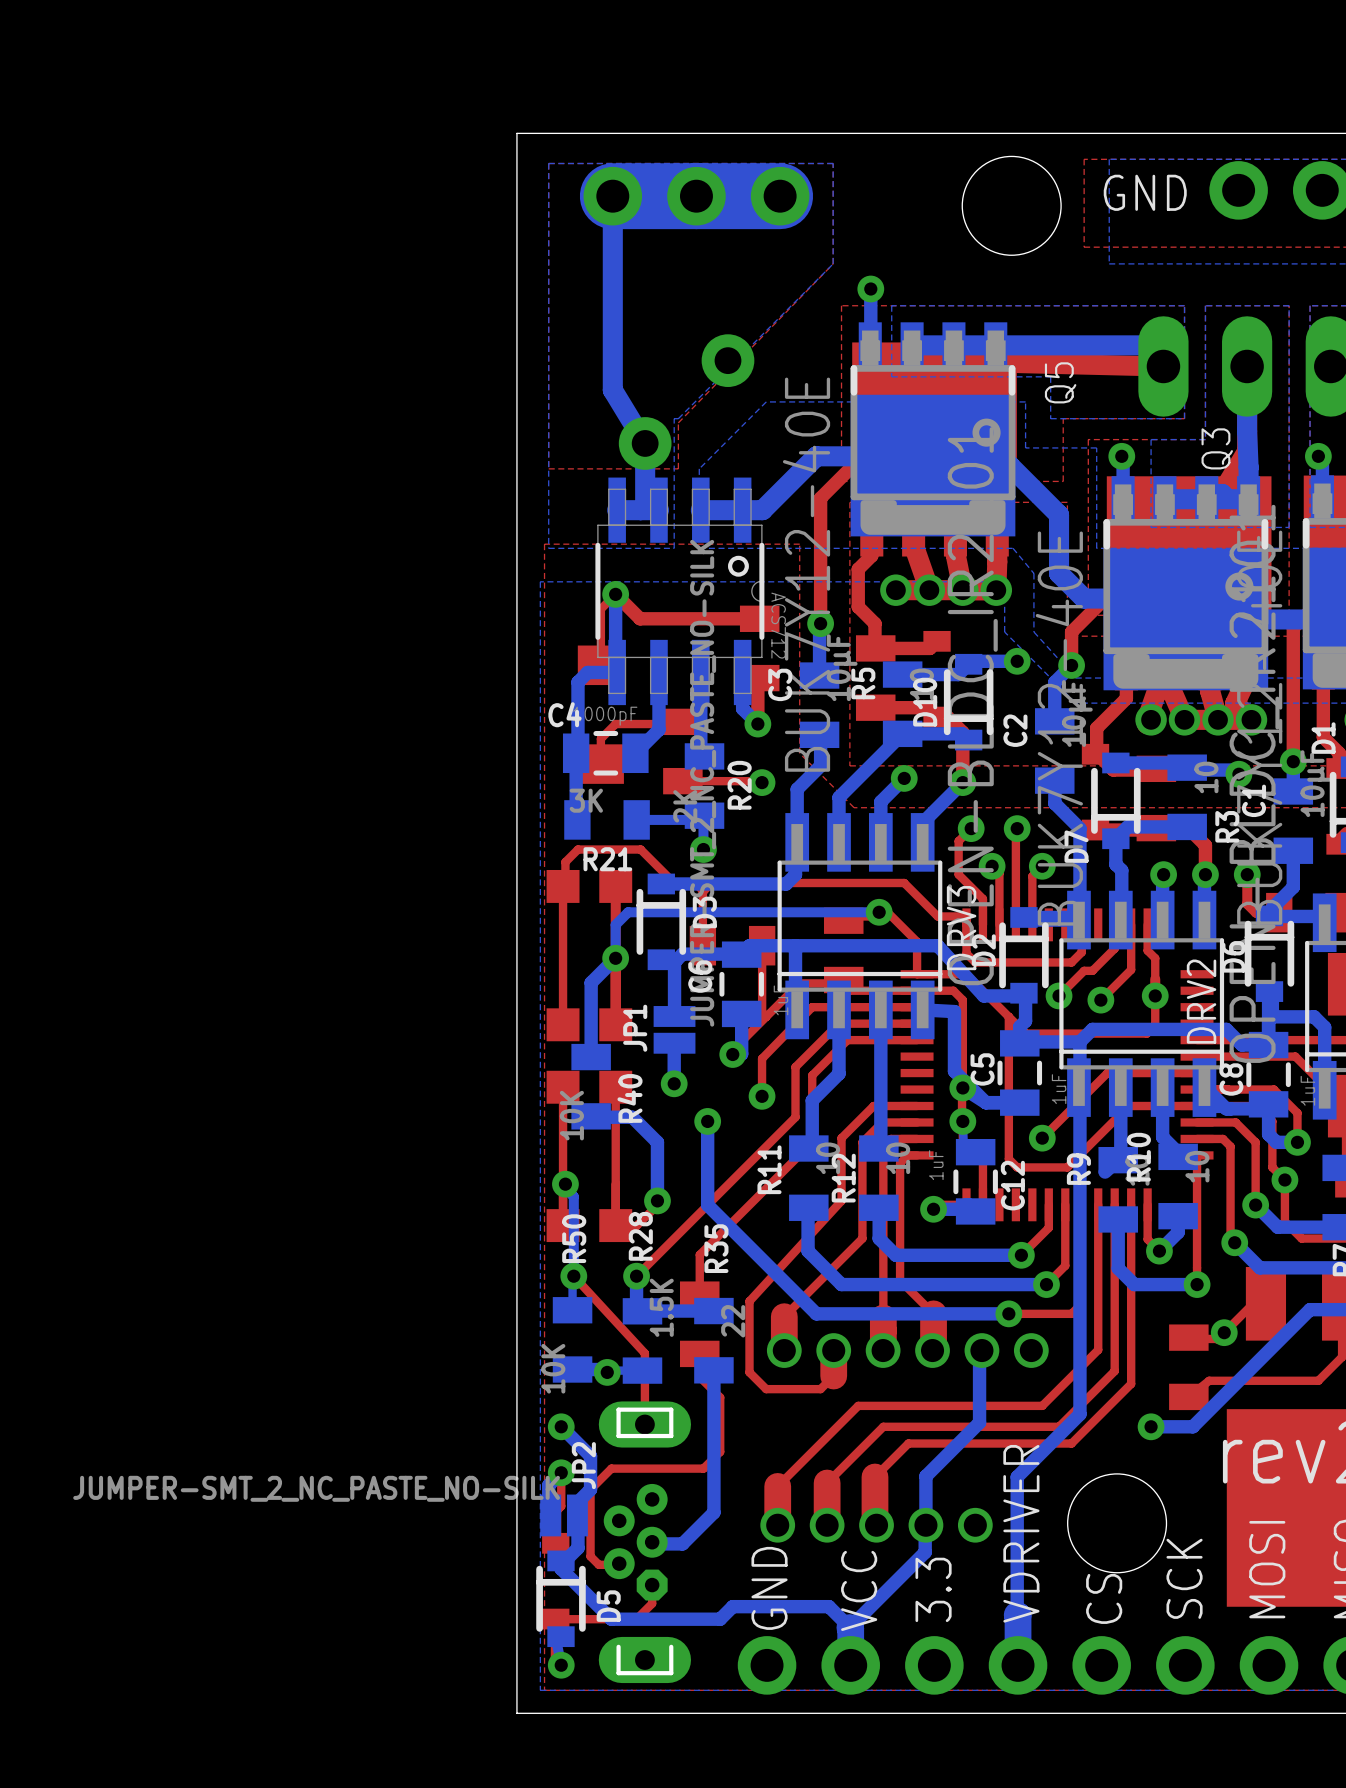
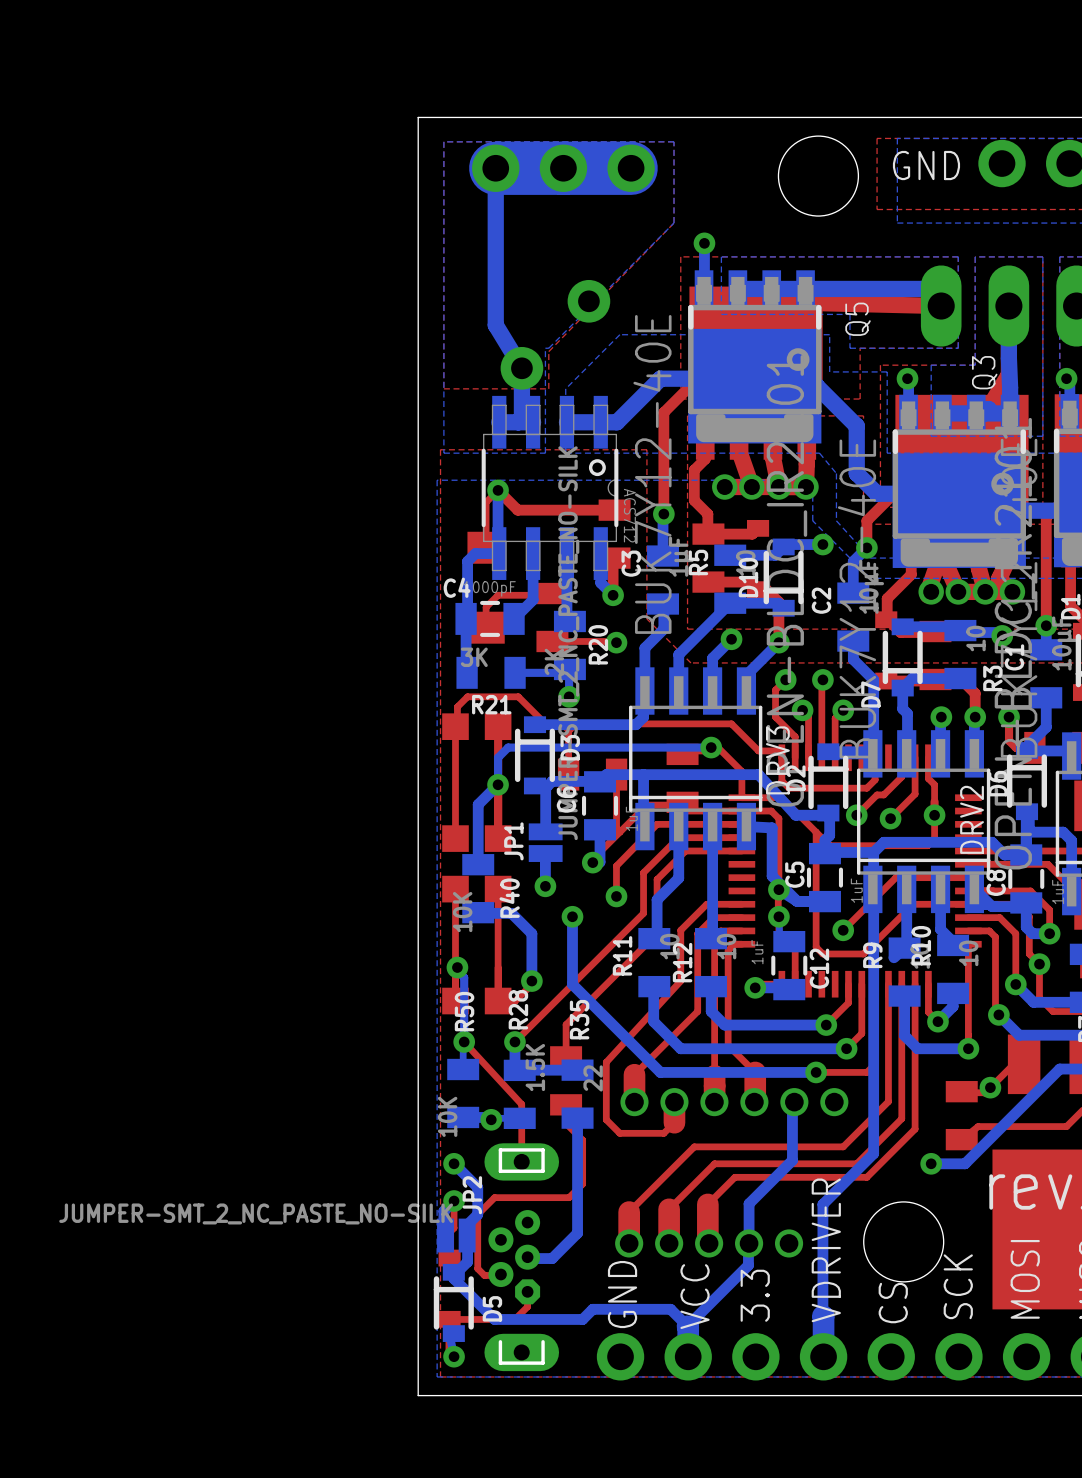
C3 value: 10µF (842, 667) -> 1µF (681, 556)

